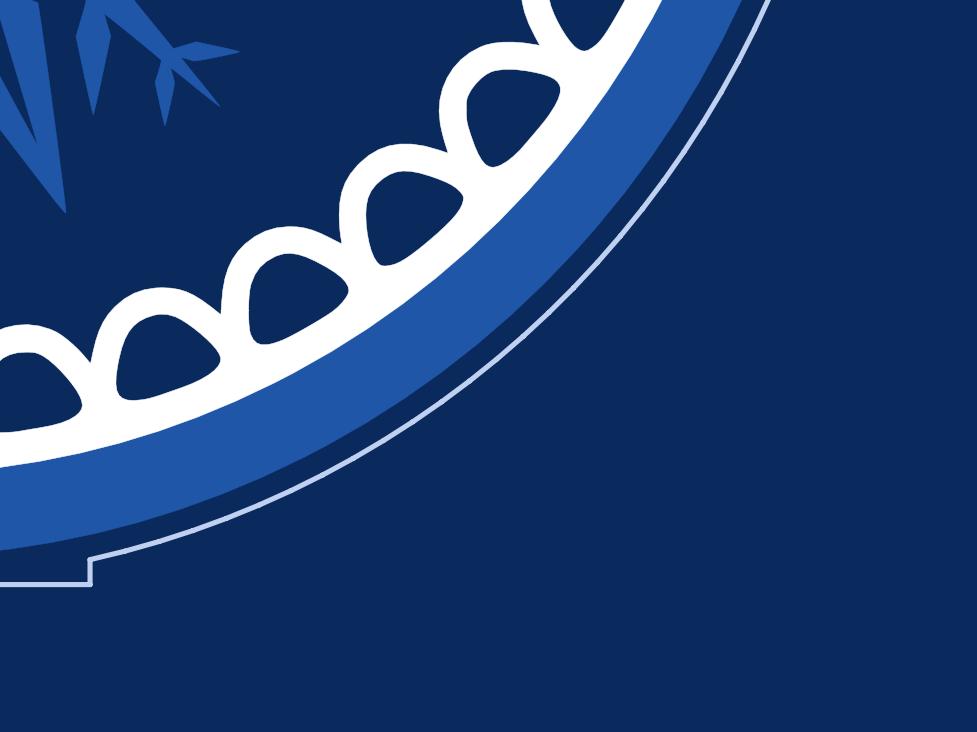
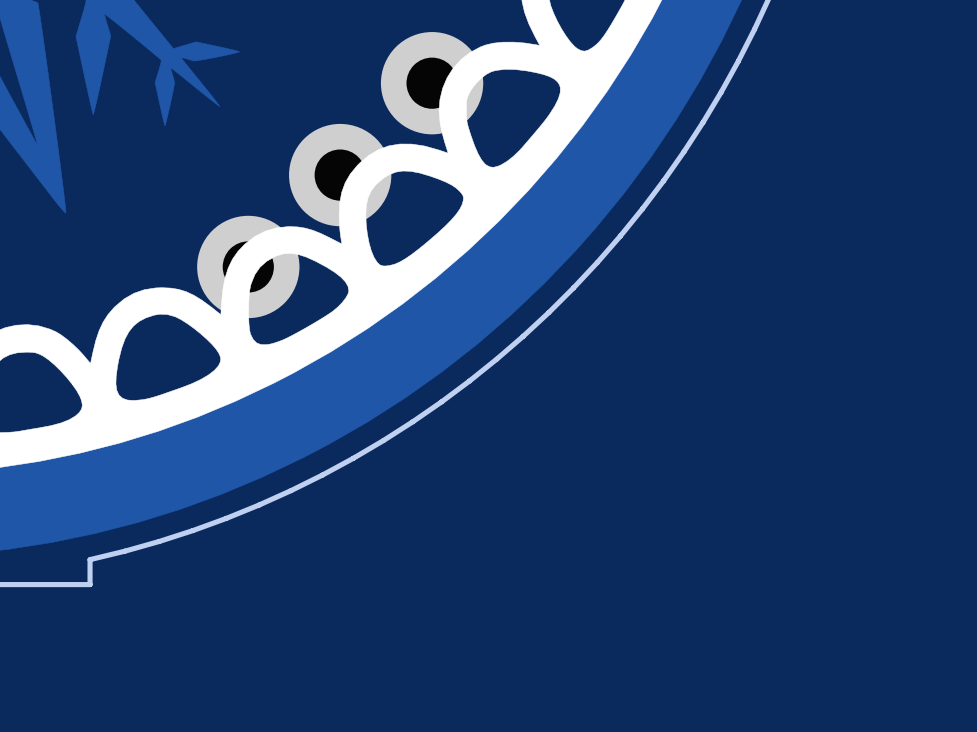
part: none -> (340, 175)

